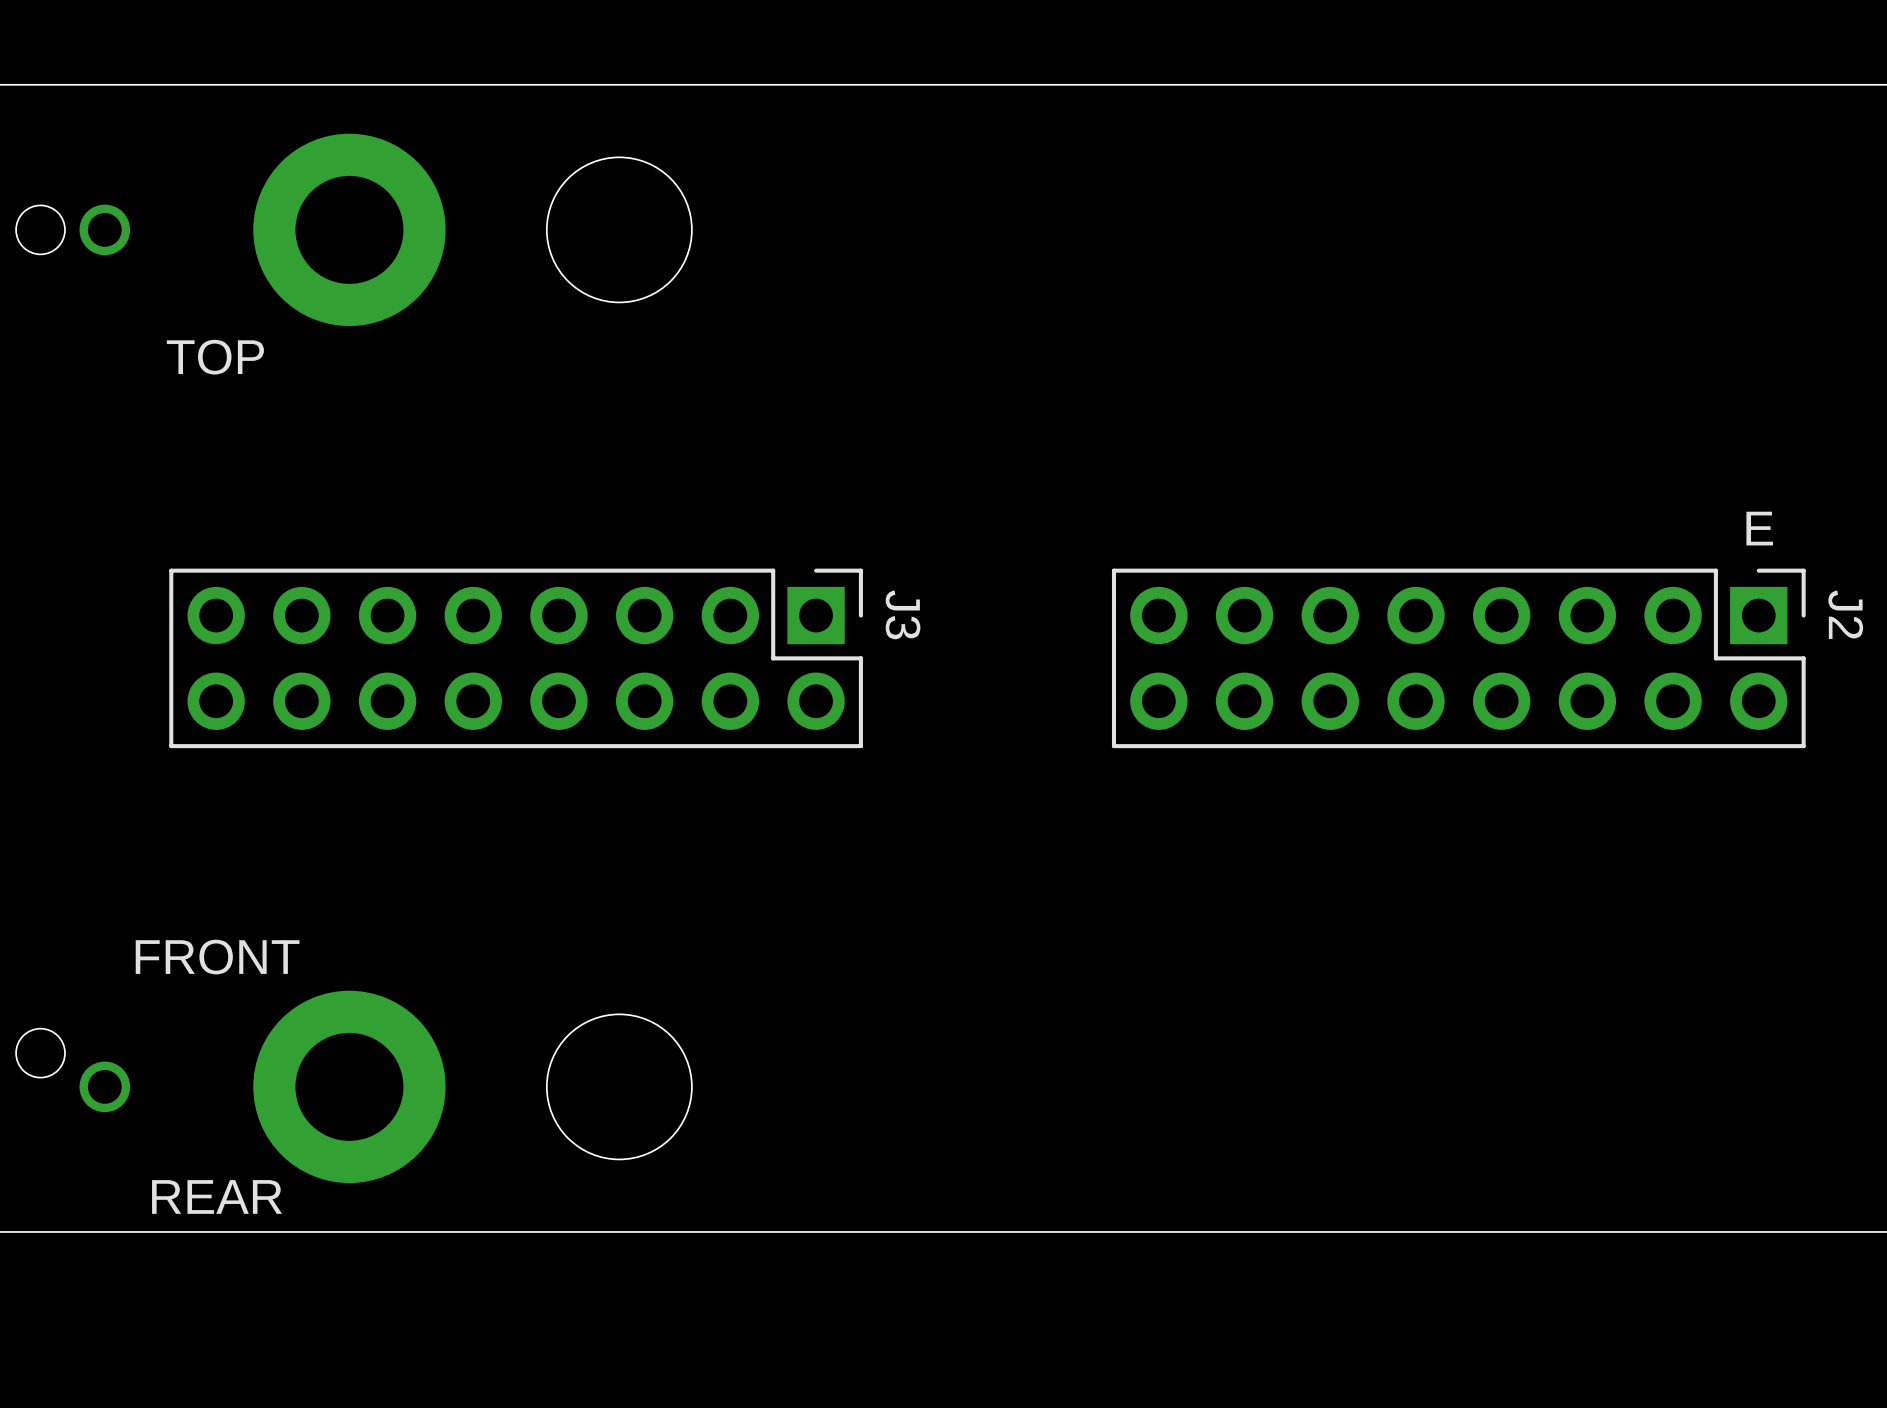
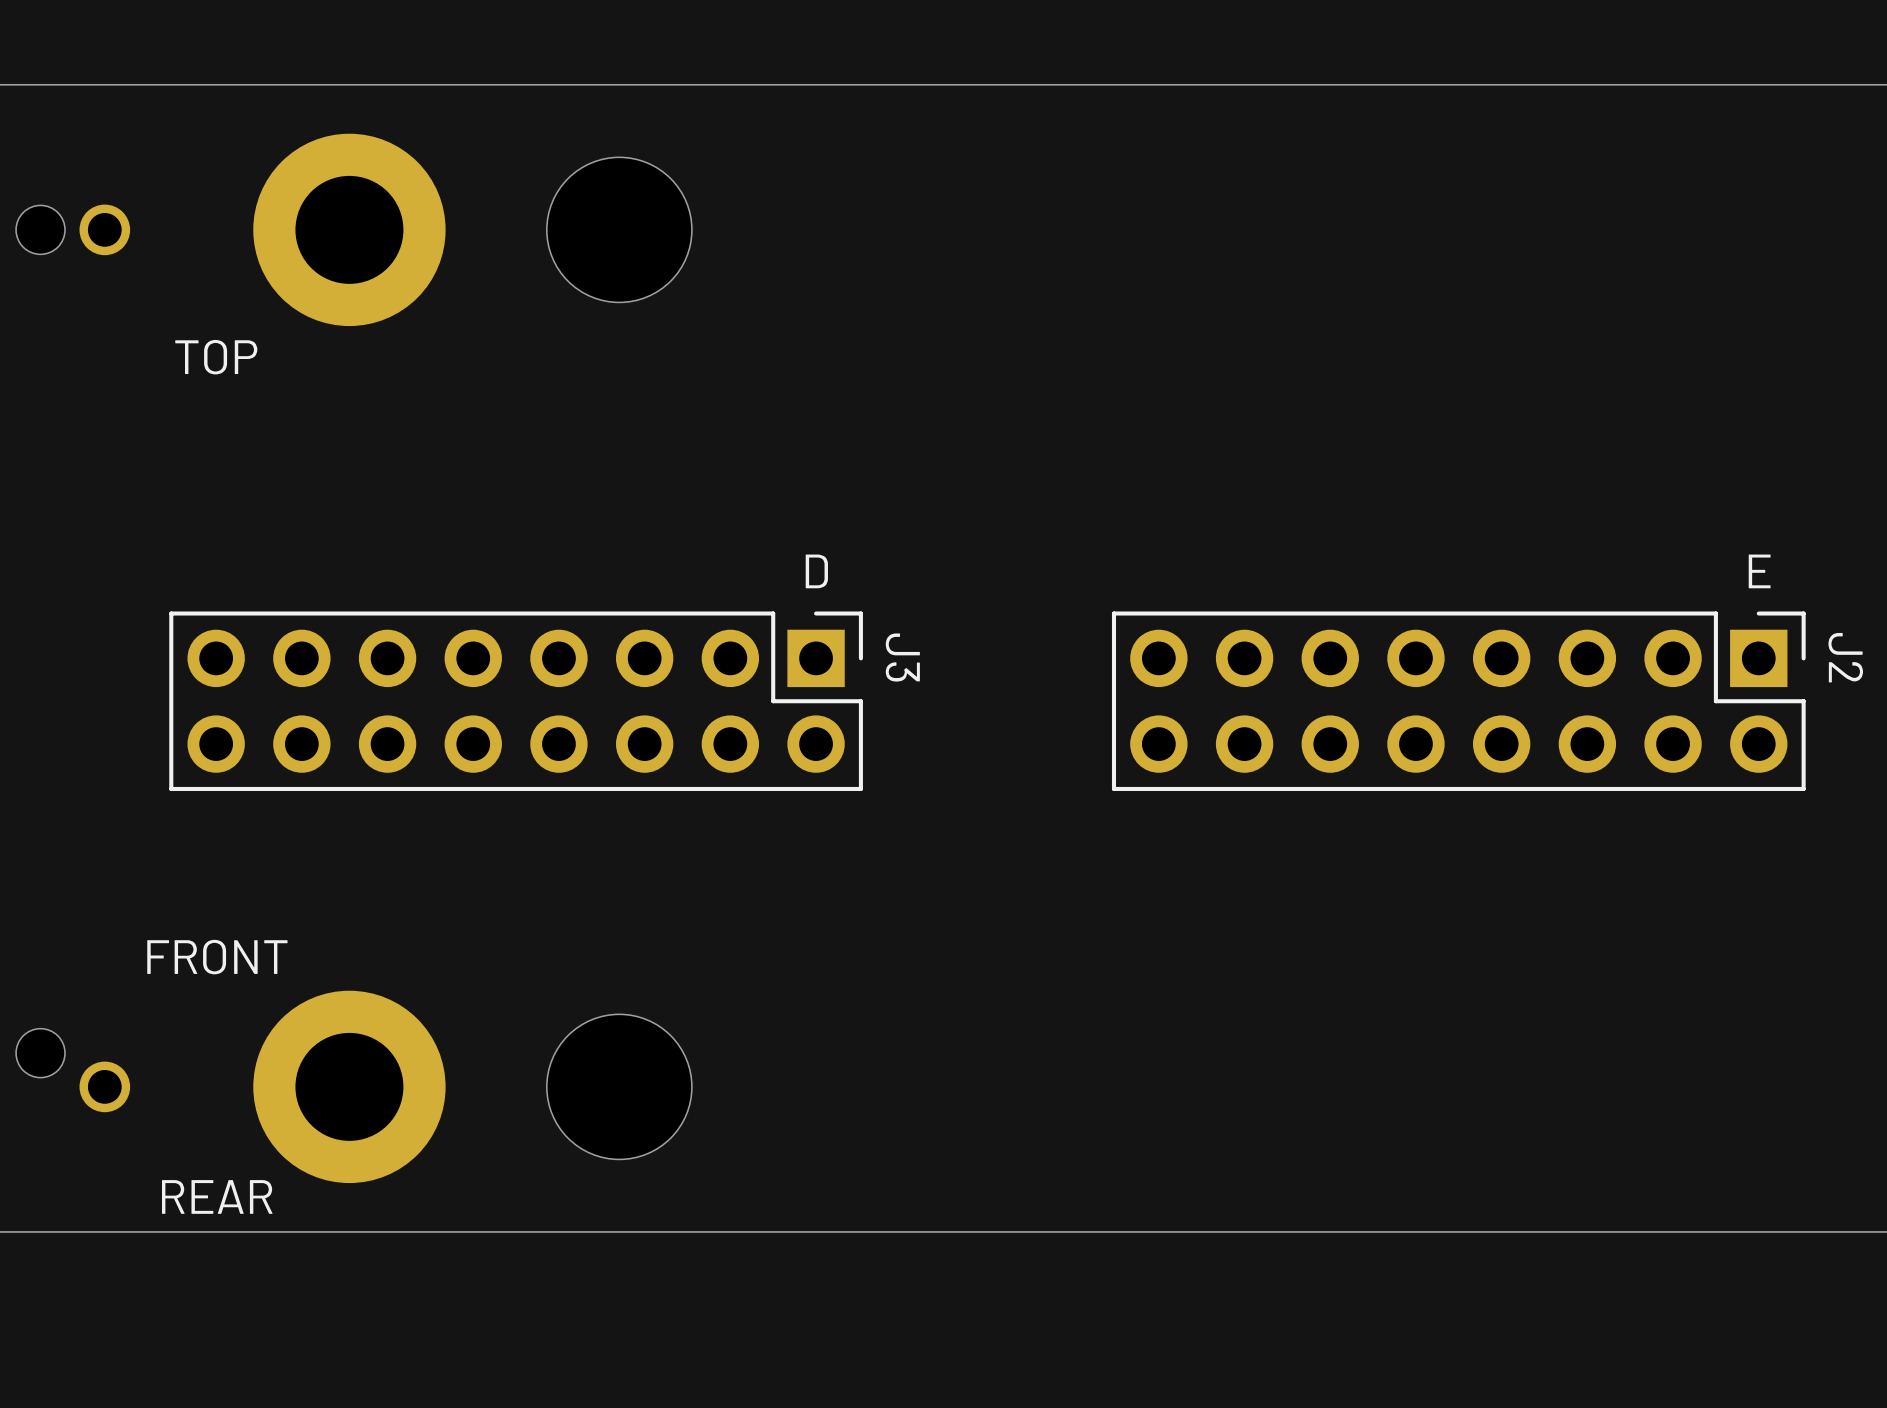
text position: E (1759, 528) -> E (1759, 571)
text: none -> D (816, 571)
J3 position: (516, 658) -> (516, 701)
J2 position: (1458, 658) -> (1458, 701)

